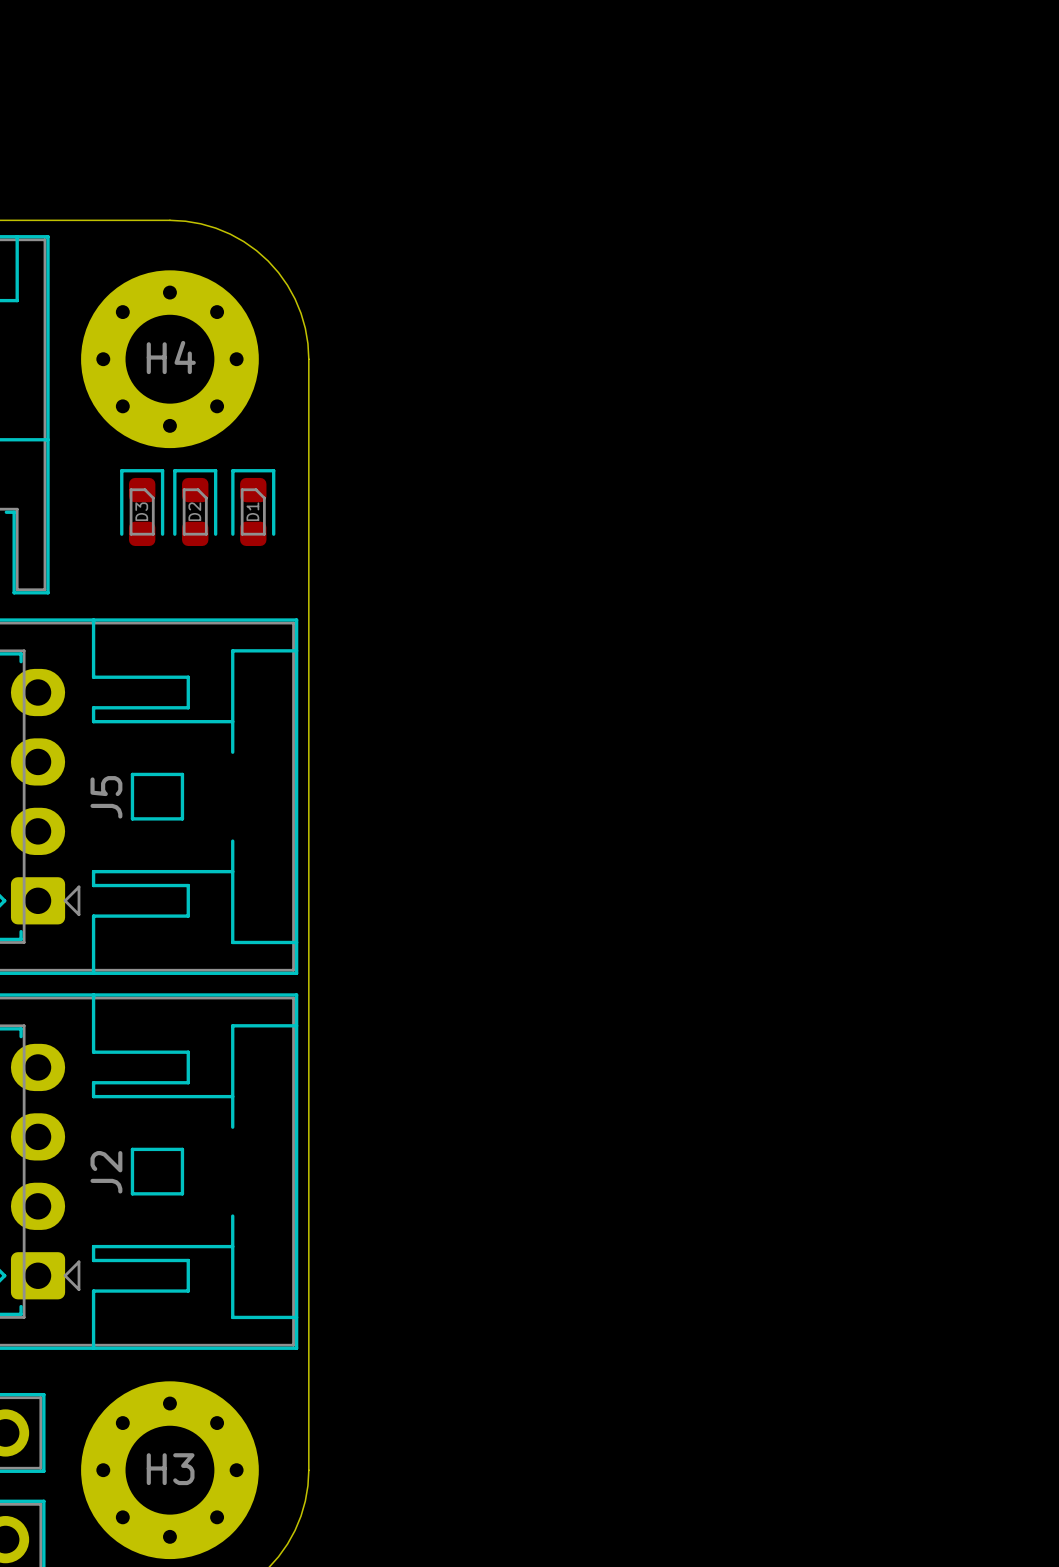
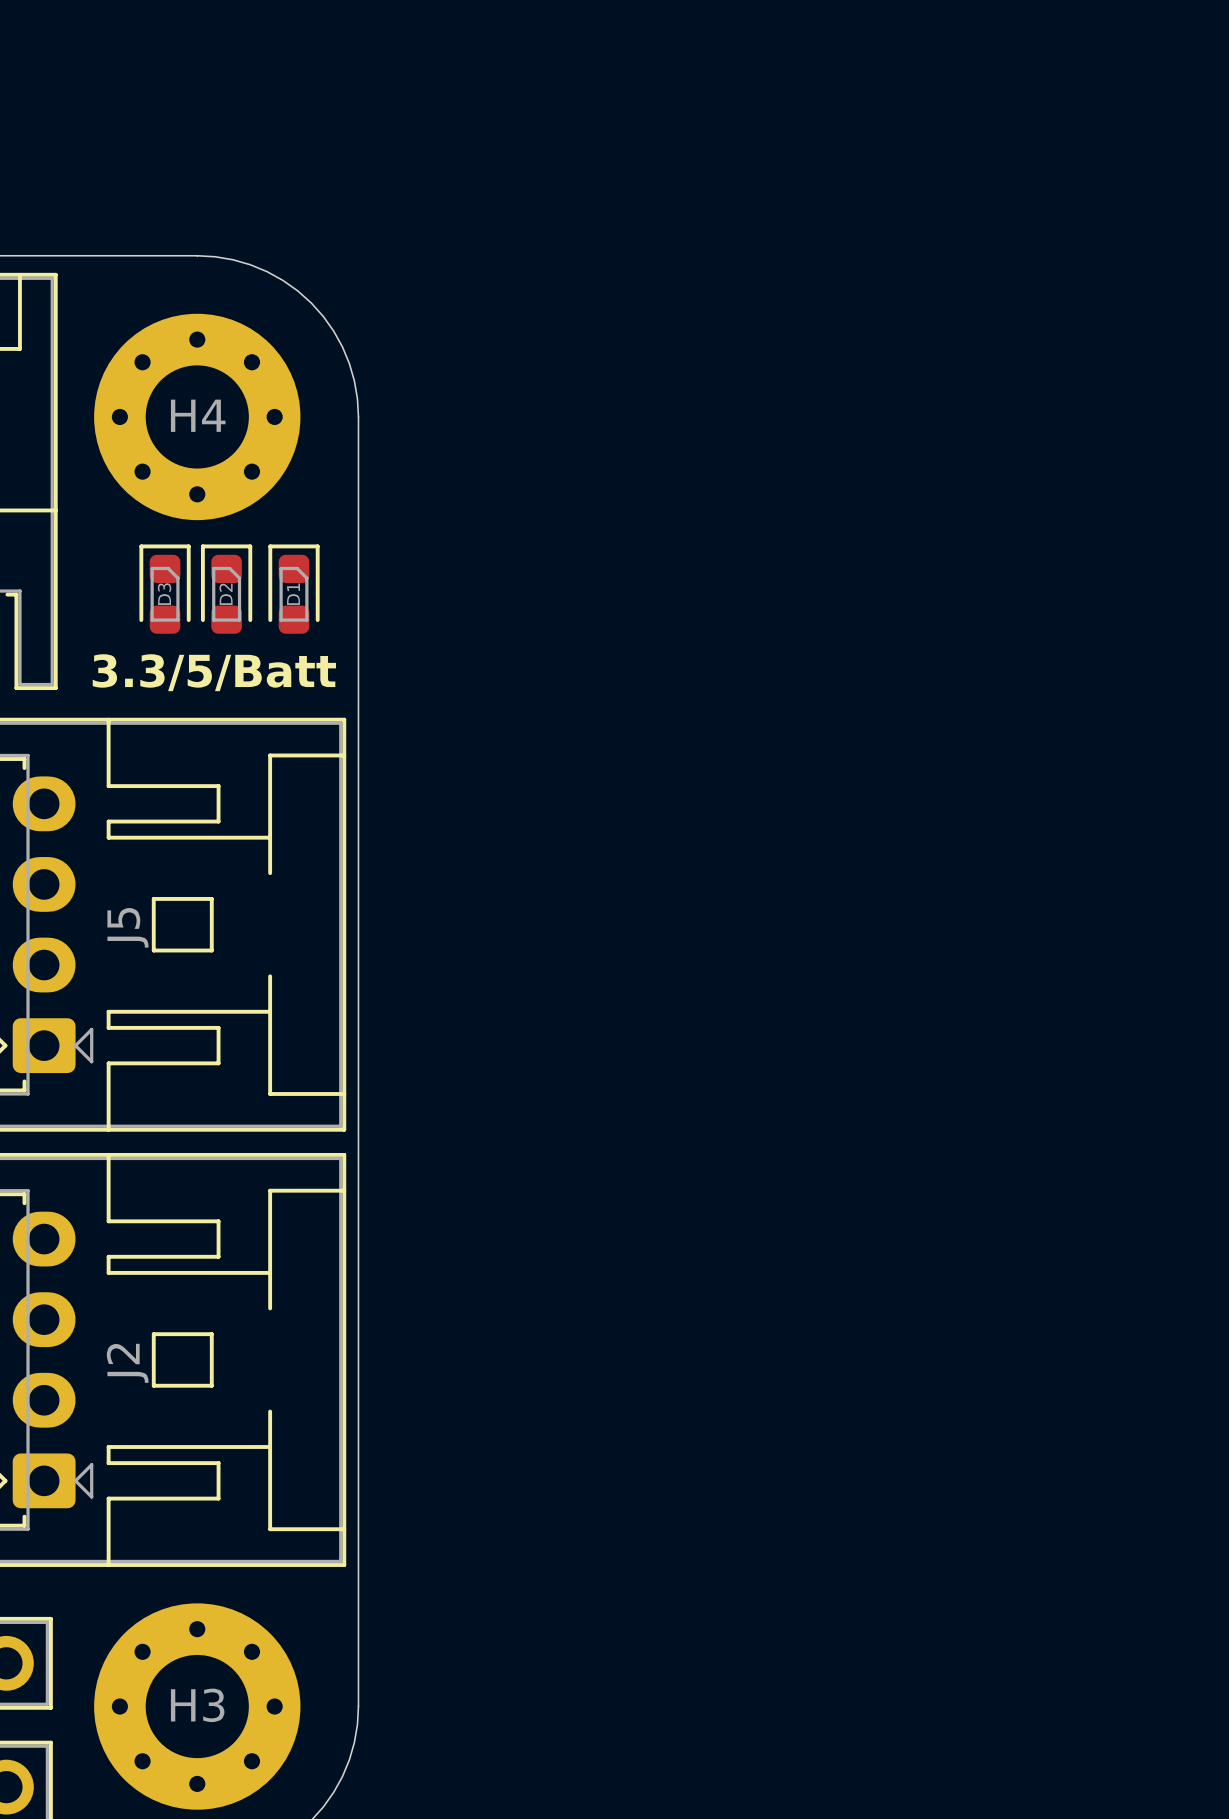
text: none -> 3.3/5/Batt (214, 672)

